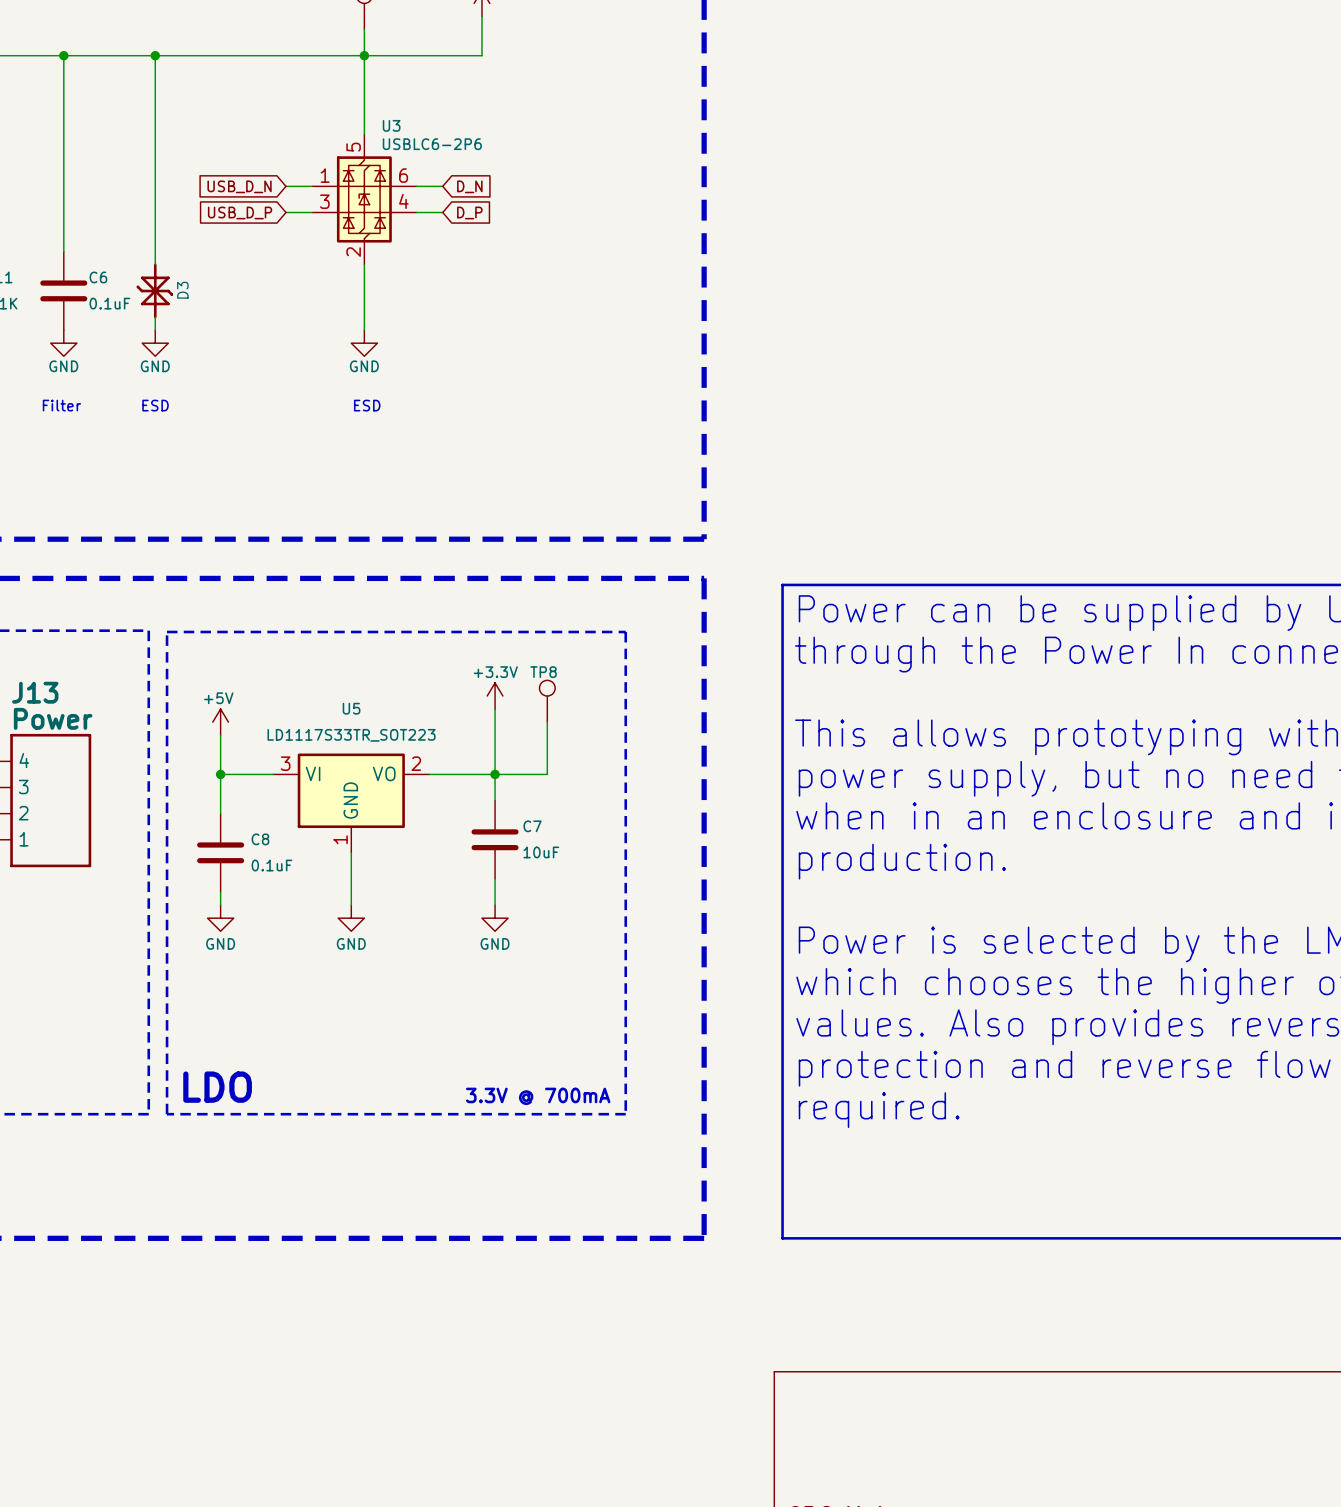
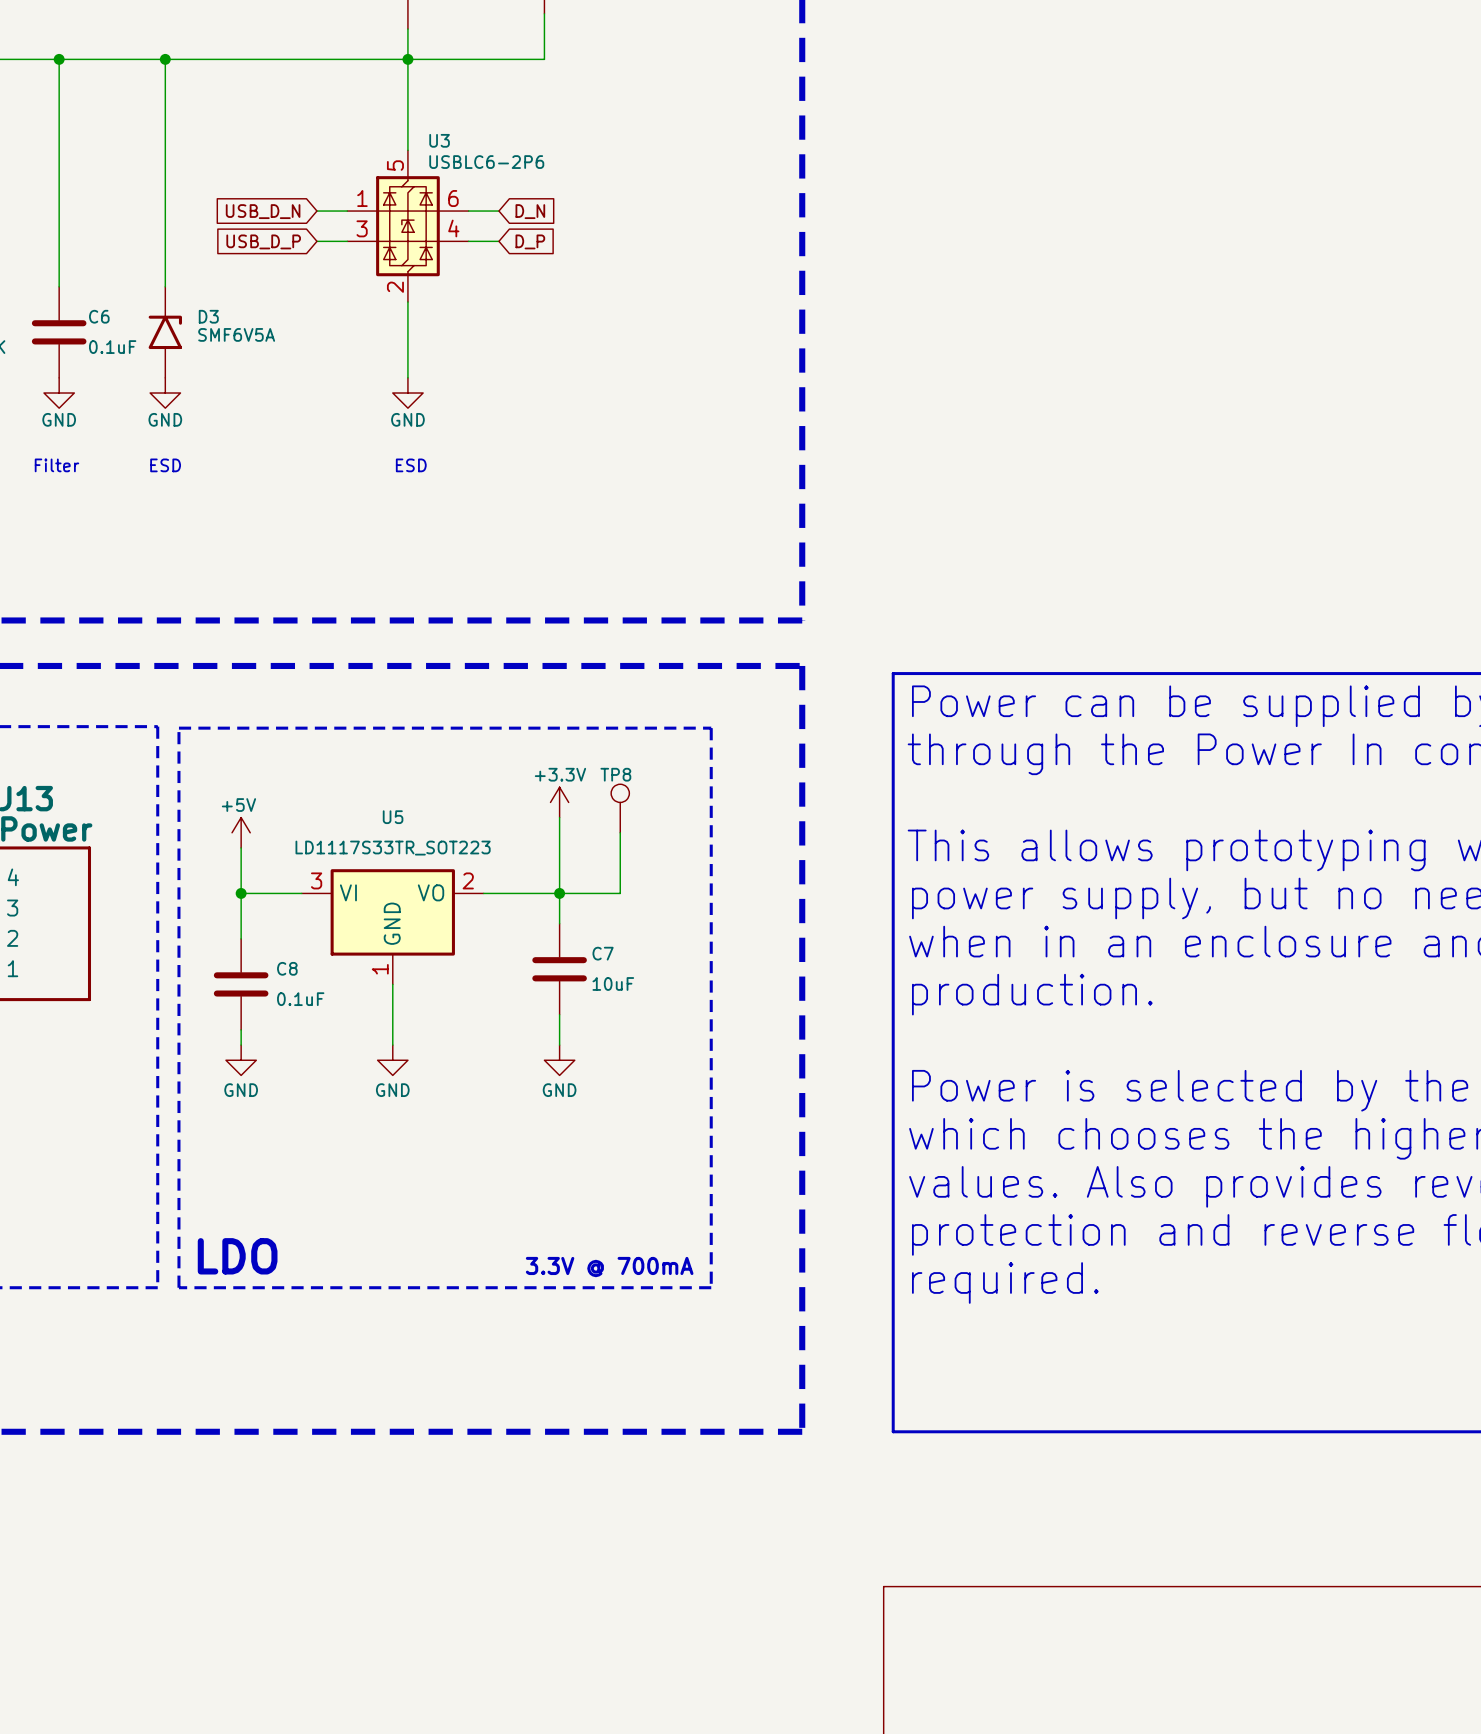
D3 symbol: [136, 263, 174, 319] -> [148, 286, 182, 378]
D3 value: none -> SMF6V5A (236, 334)

